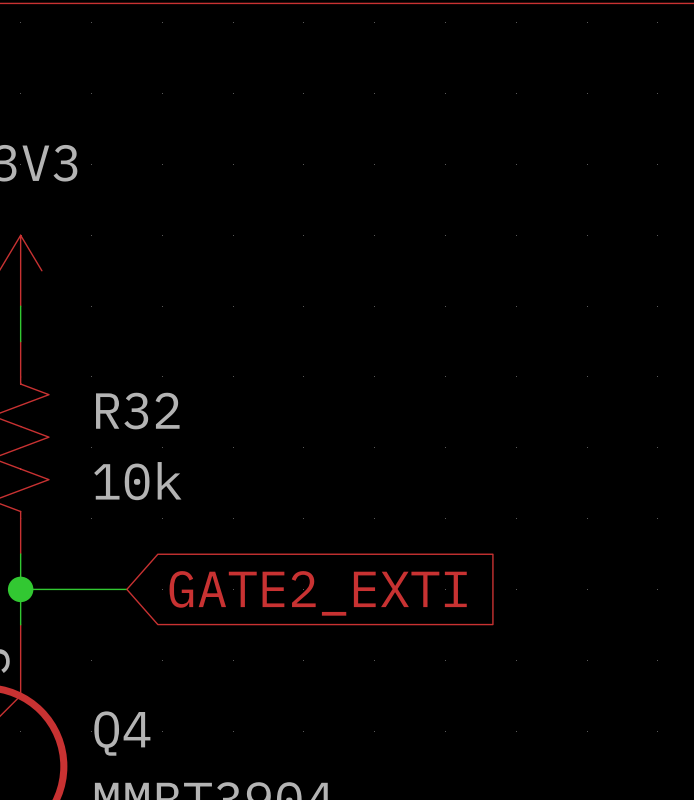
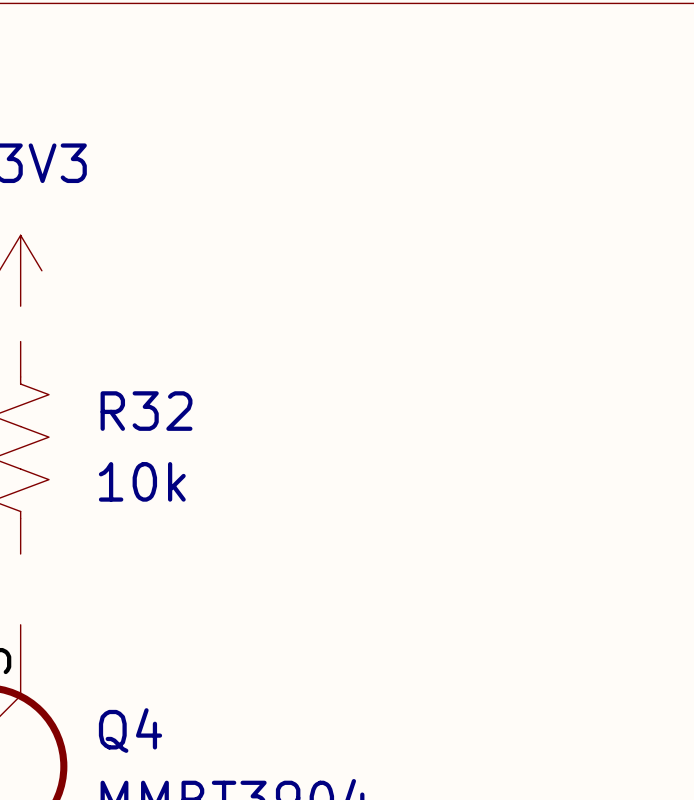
wire: (20, 306) (20, 341) -> none
wire: (20, 554) (20, 624) -> none
wire: (20, 589) (126, 589) -> none
junction: (20, 589) -> none
global label: GATE2_EXTI (318, 593) -> none

